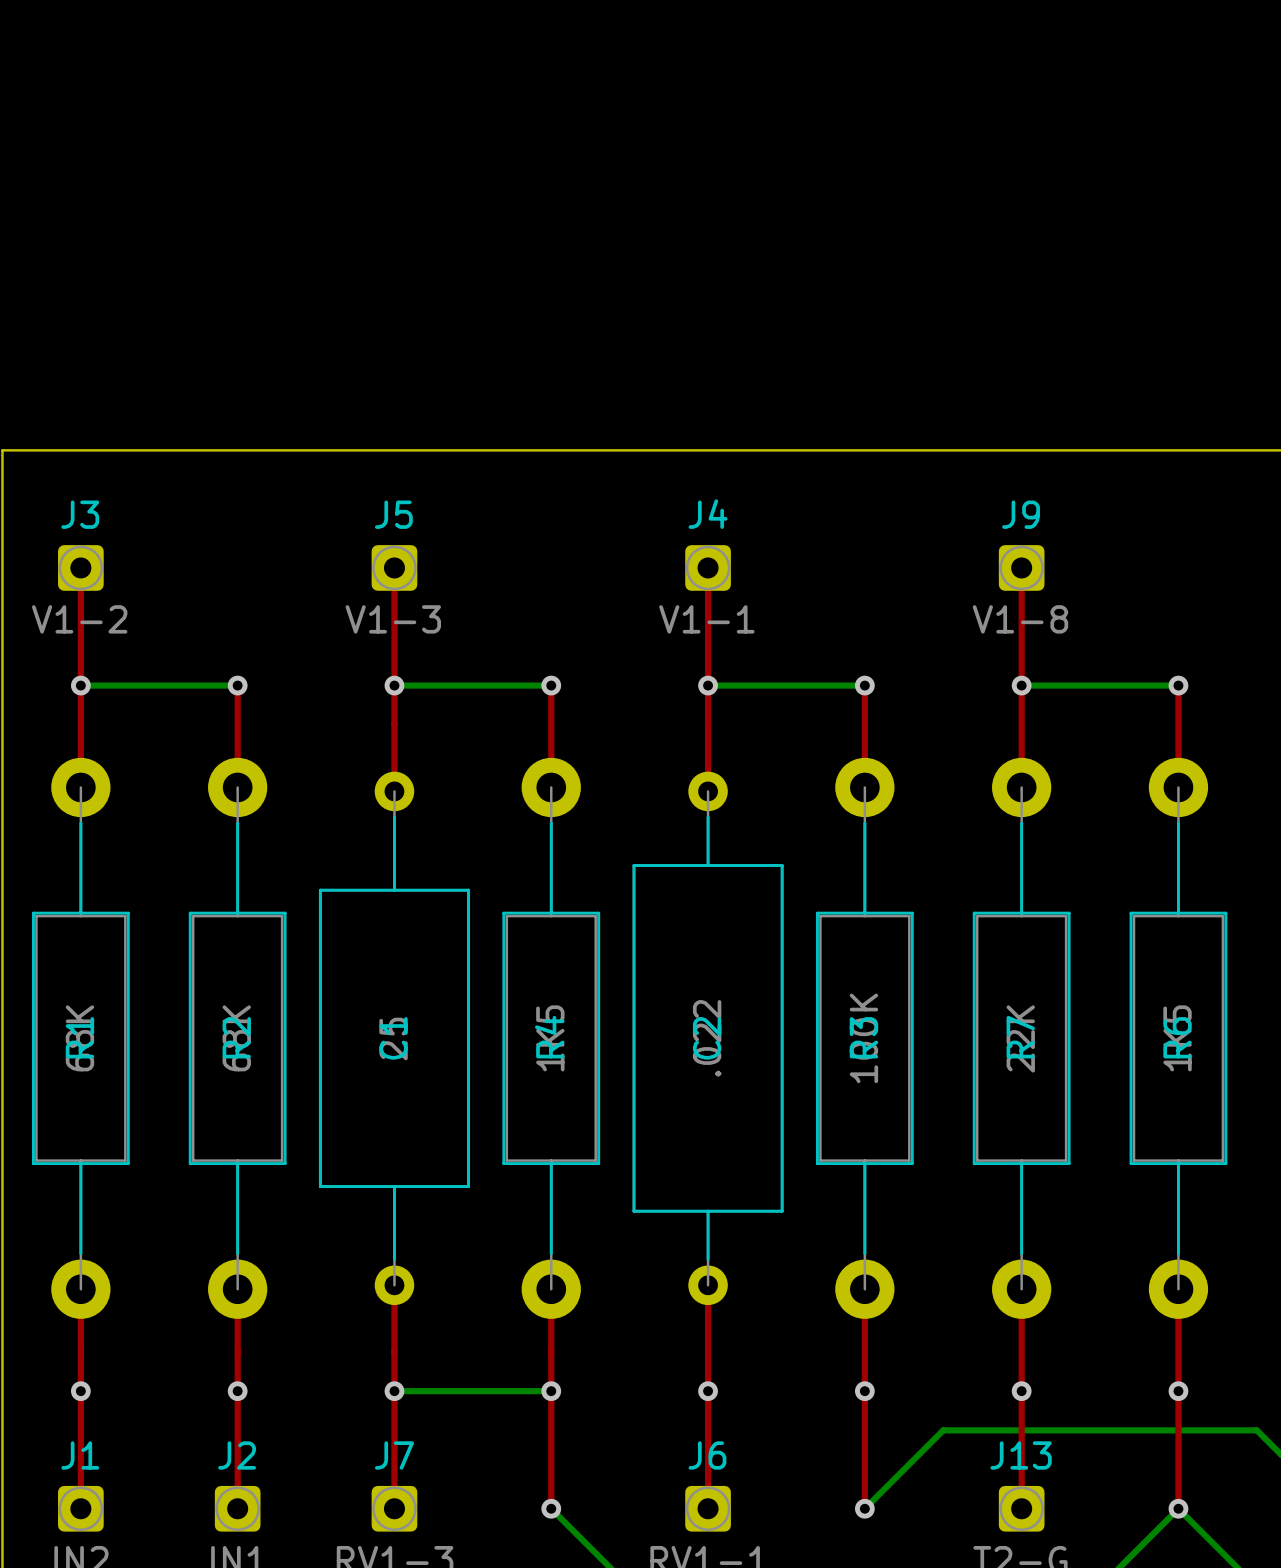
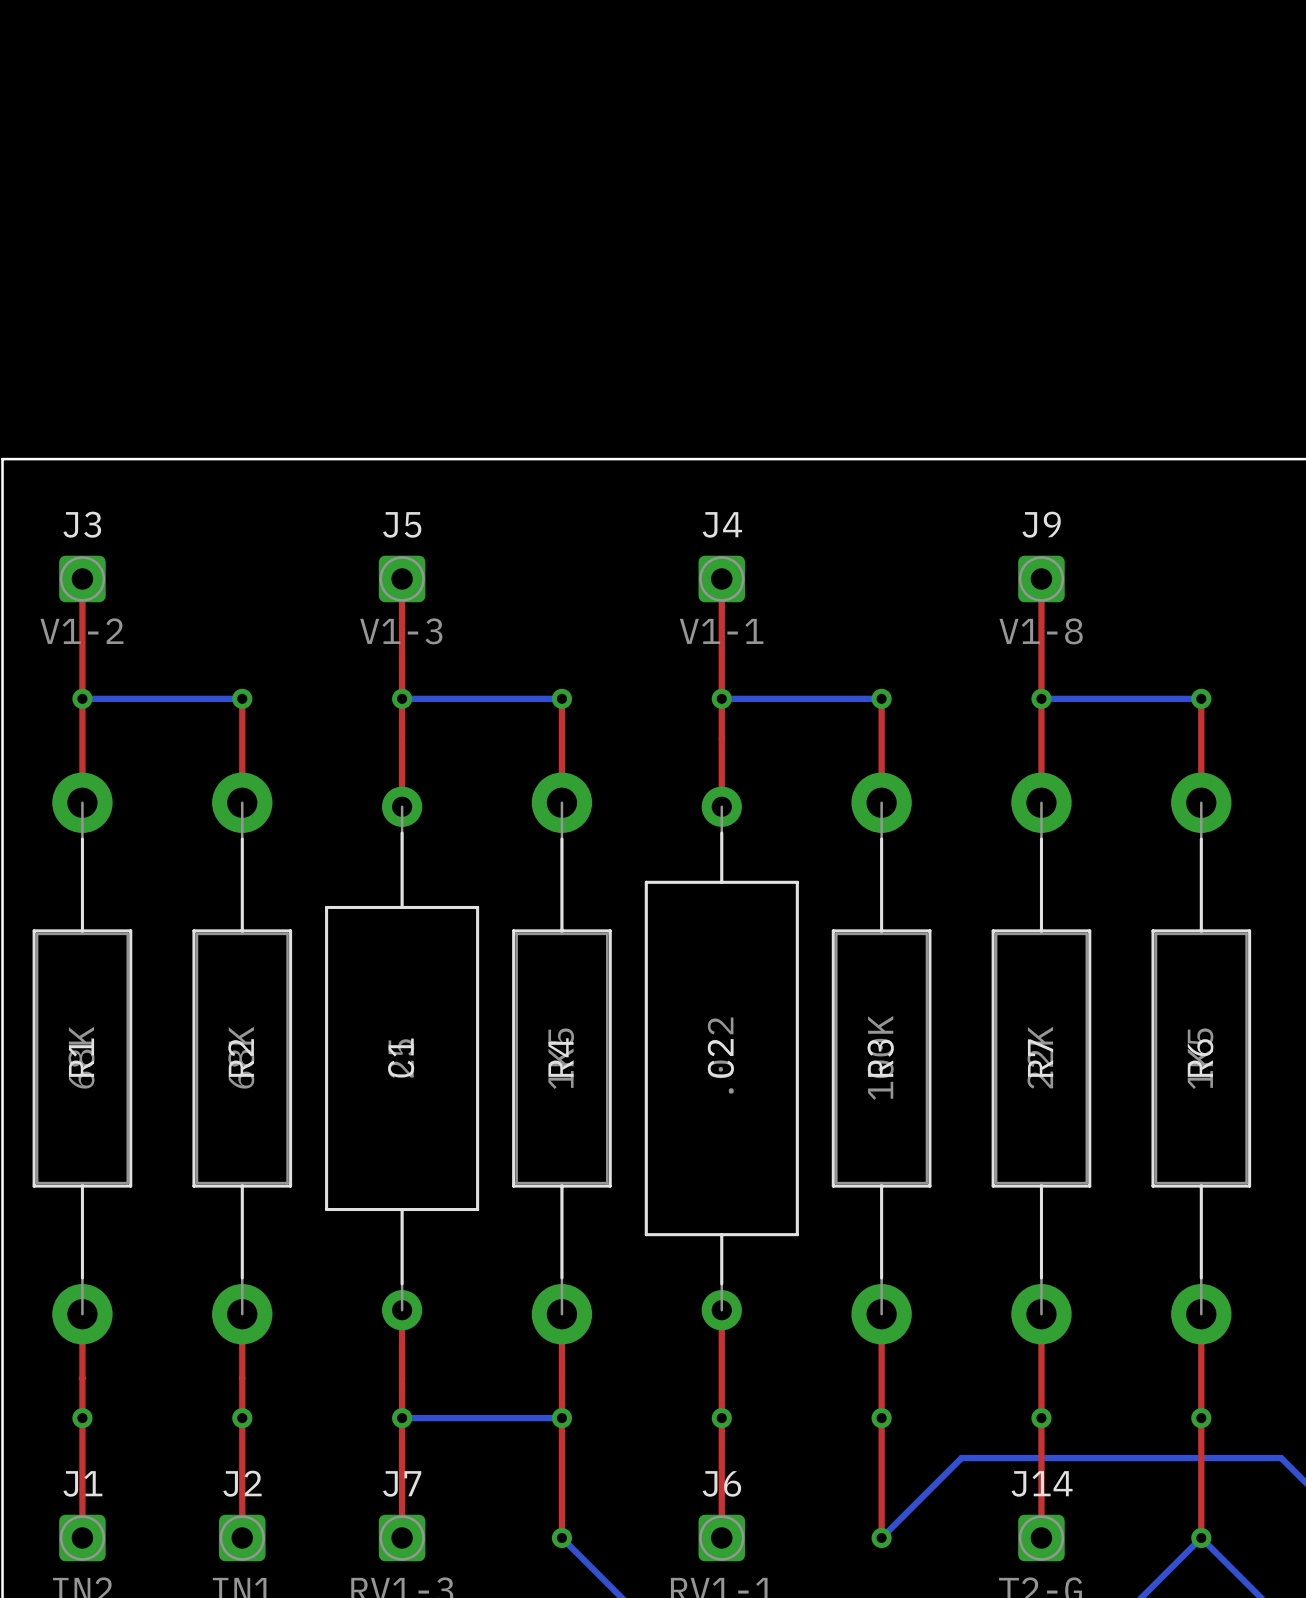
J13 name: J13 (1021, 1455) -> J14 (1042, 1483)

